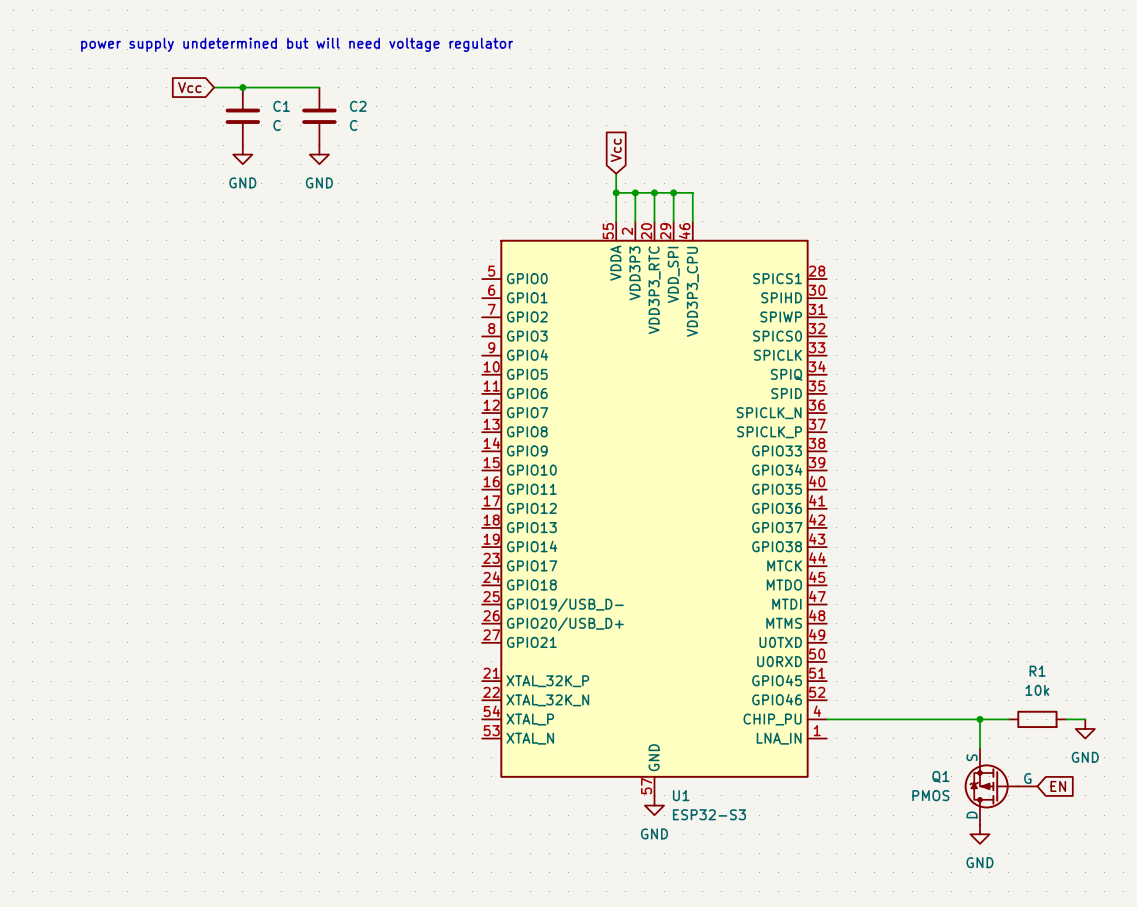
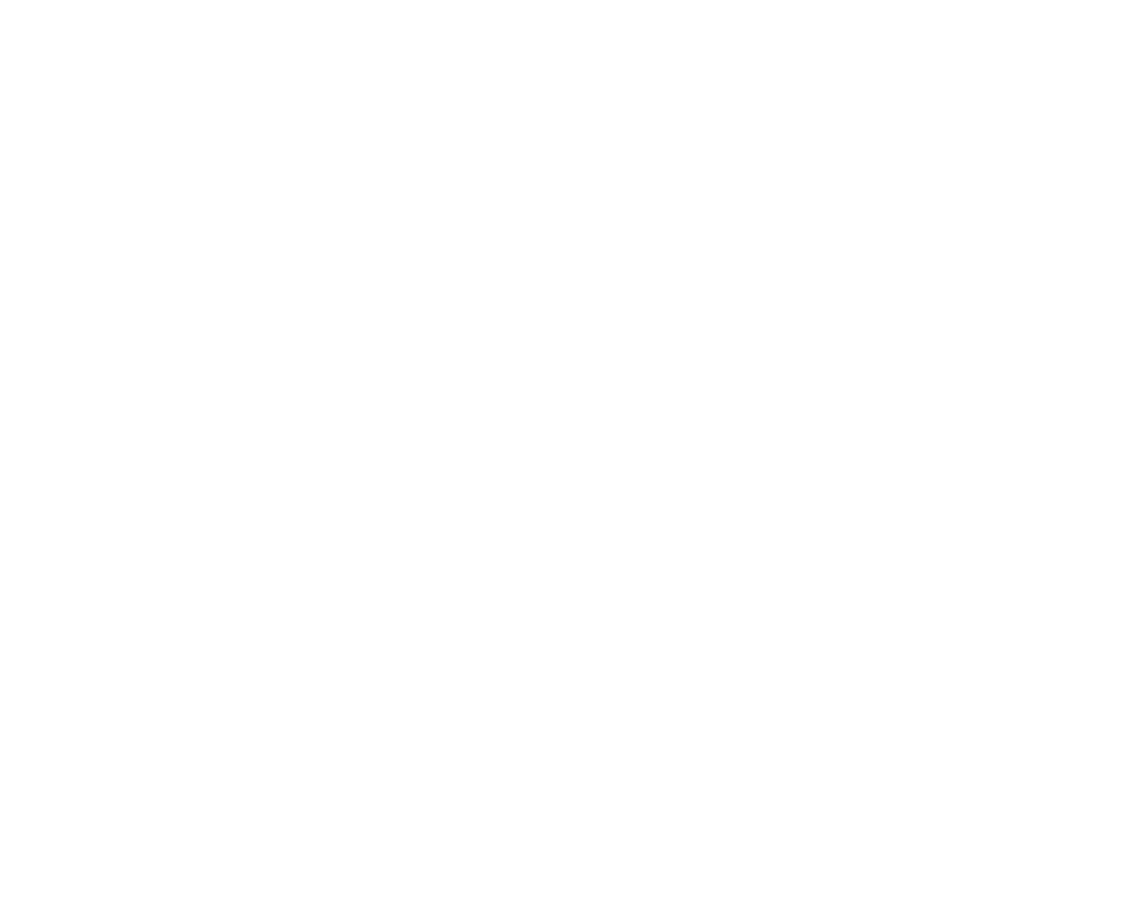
text: power supply undetermined but will need voltage regulator (297, 44) -> none
global label: Vcc (189, 87) -> none
wire: (214, 87) (319, 87) -> none
junction: (242, 87) -> none
C1: C (242, 116) -> none
C2: C (319, 116) -> none
global label: Vcc (616, 150) -> none
power symbol: GND (242, 154) -> none
power symbol: GND (319, 154) -> none
wire: (616, 173) (616, 221) -> none
wire: (616, 192) (692, 192) (692, 221) -> none
junction: (616, 192) -> none
wire: (635, 192) (635, 221) -> none
junction: (635, 192) -> none
wire: (654, 192) (654, 221) -> none
junction: (654, 192) -> none
wire: (673, 192) (673, 221) -> none
junction: (673, 192) -> none
U1: ESP32-S3 (654, 508) -> none
wire: (826, 719) (1008, 719) -> none
wire: (979, 719) (979, 748) -> none
junction: (979, 719) -> none
R1: 10k (1037, 719) -> none
wire: (1066, 719) (1085, 719) -> none
power symbol: GND (1085, 728) -> none
Q1: PMOS (1001, 786) -> none
global label: EN (1058, 786) -> none
power symbol: GND (654, 805) -> none
power symbol: GND (979, 834) -> none

